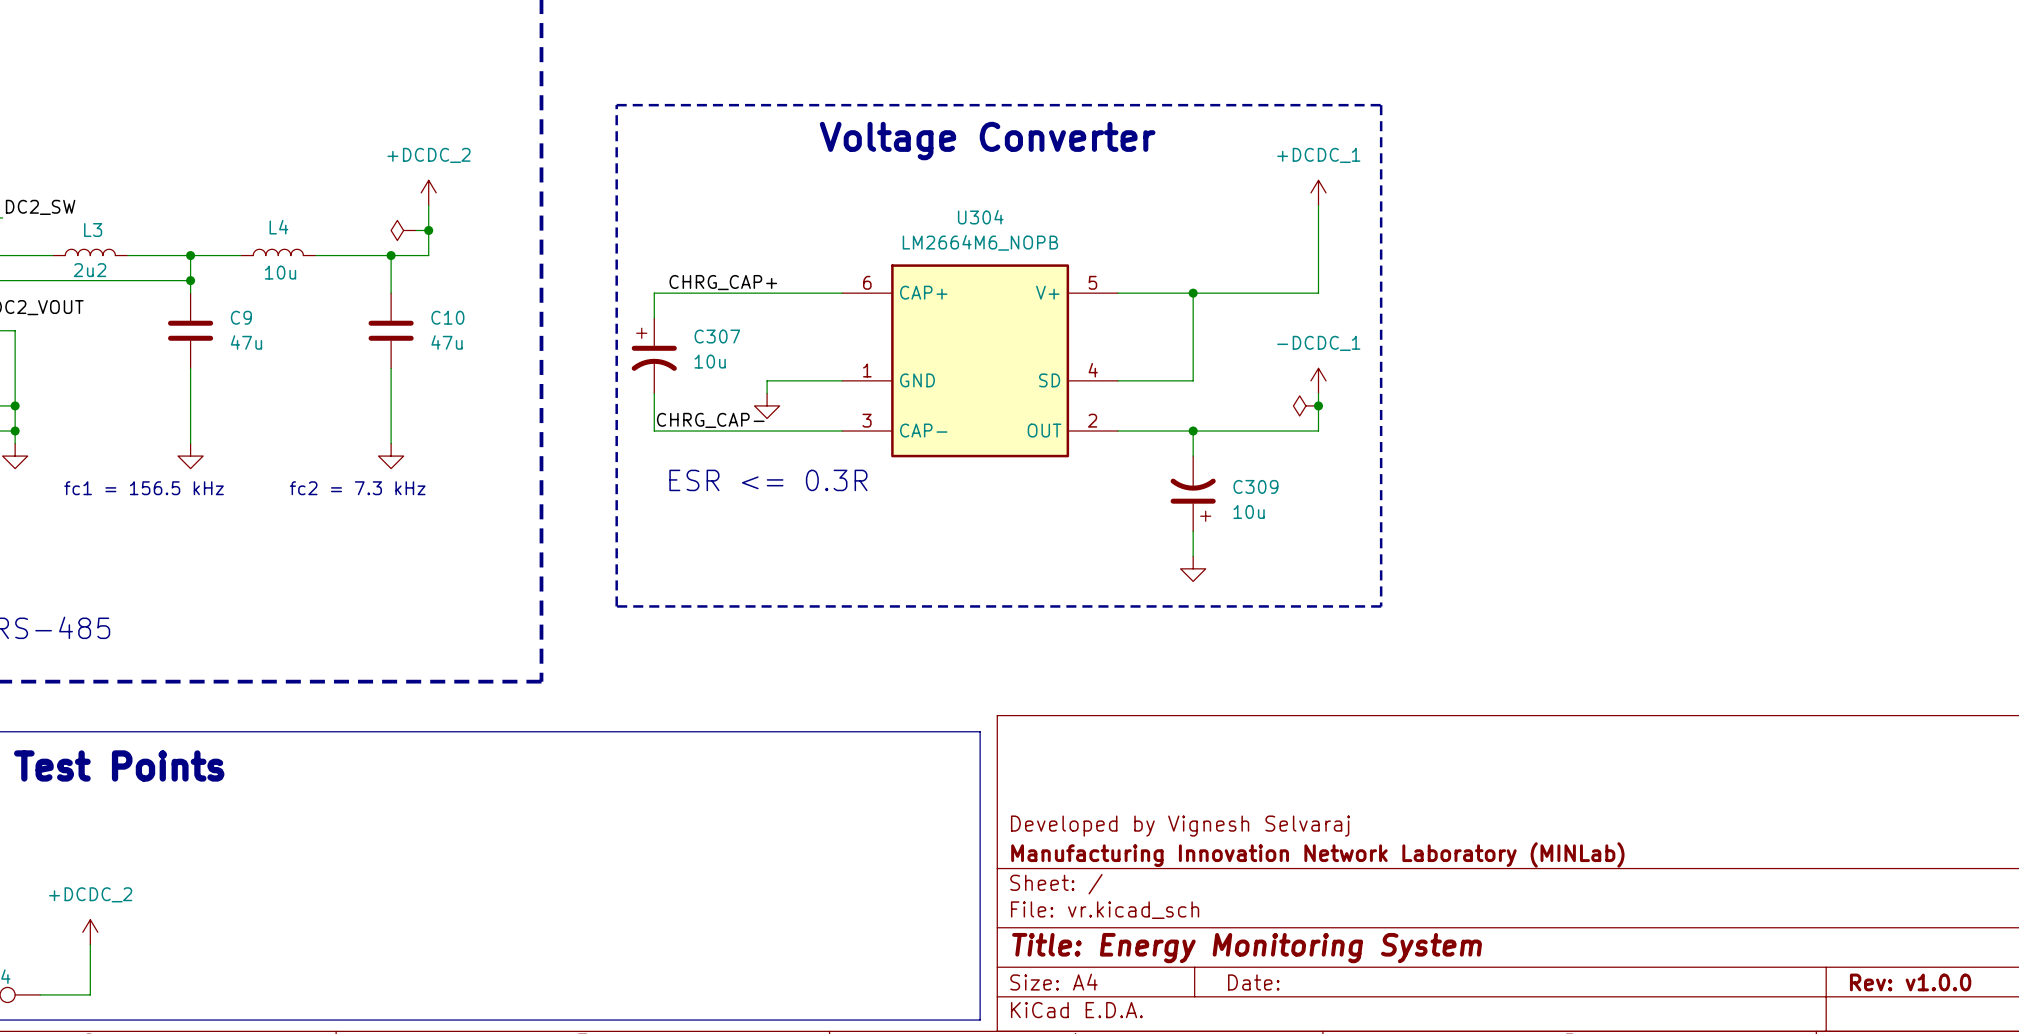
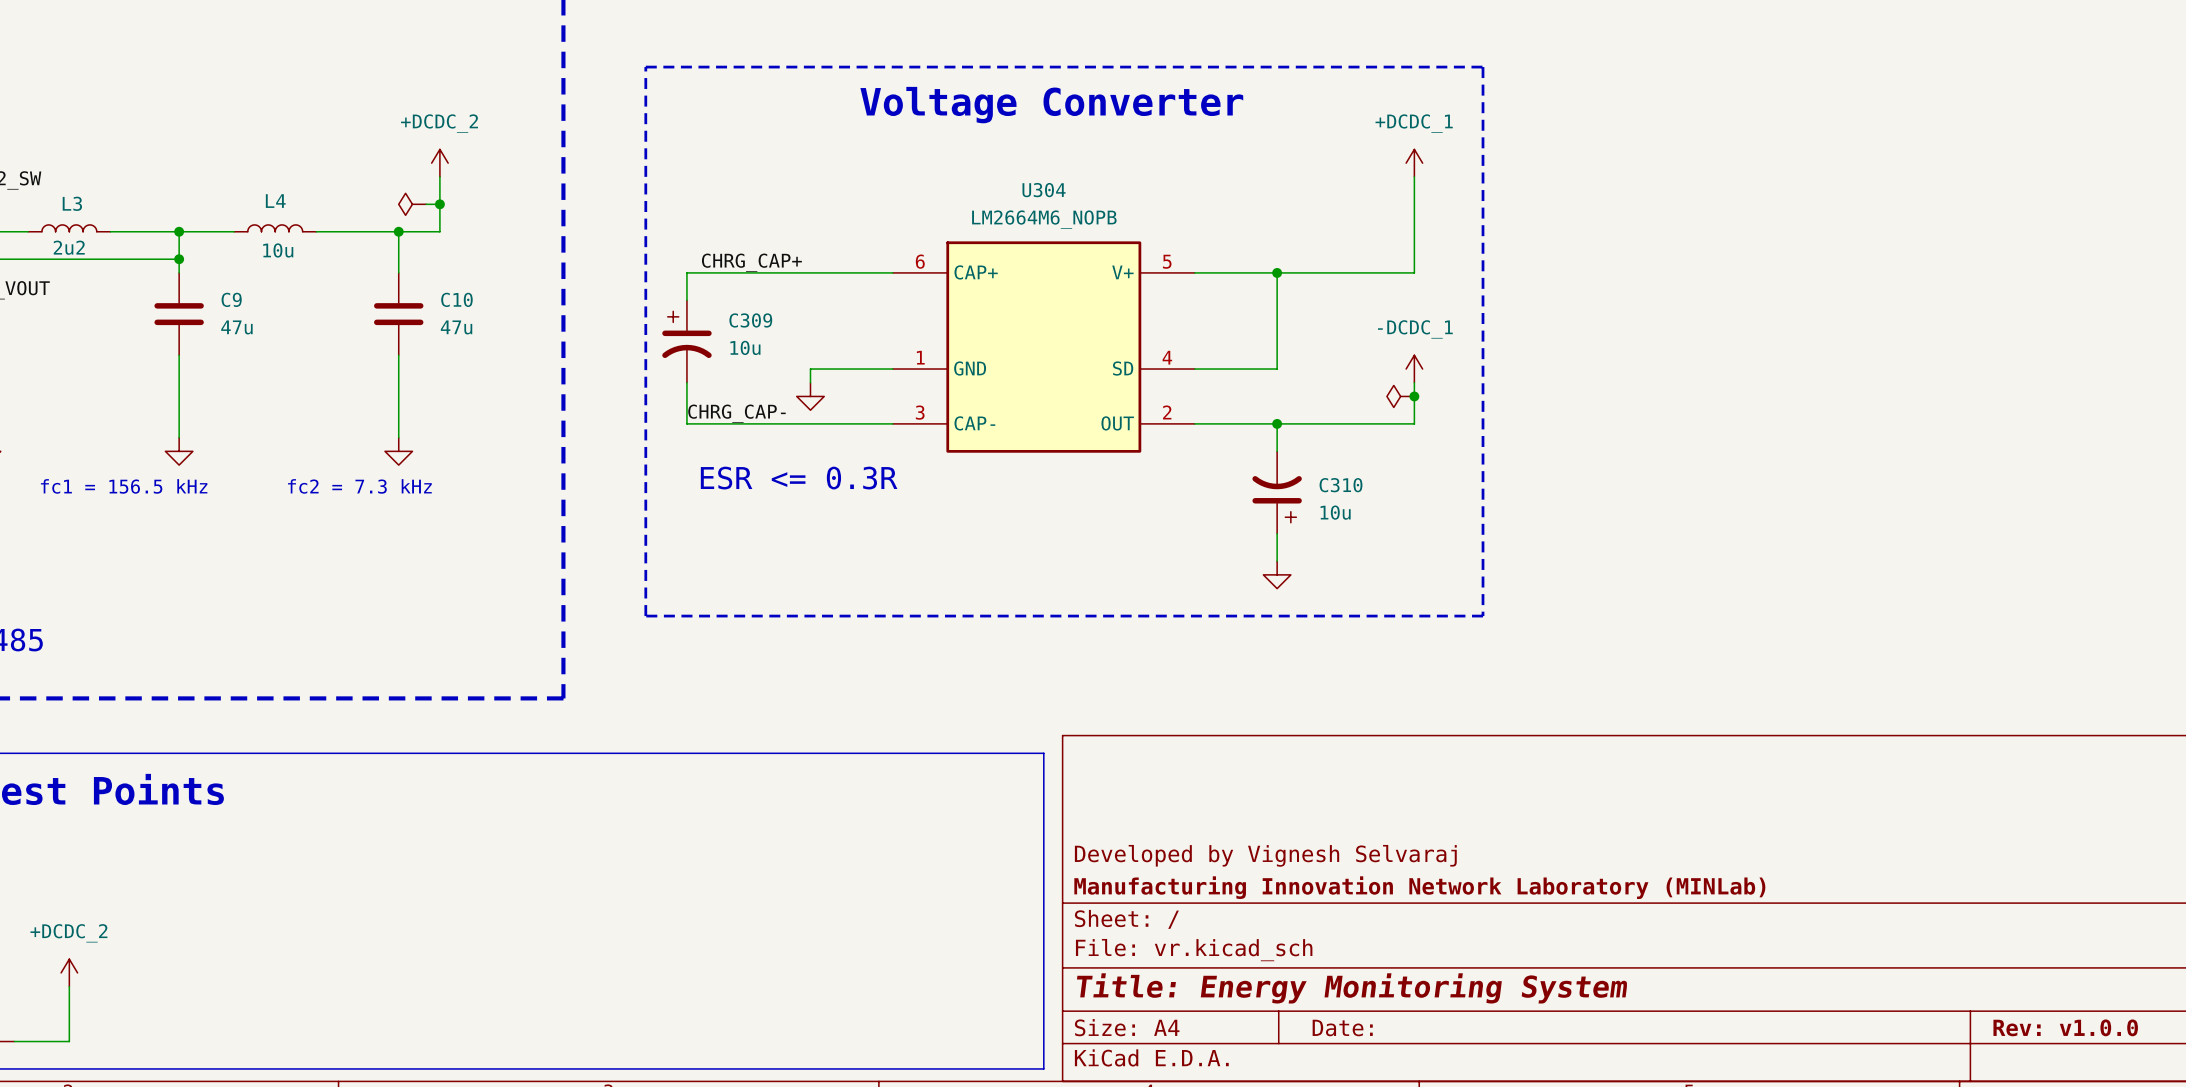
C307 name: C307 (717, 336) -> C309 (750, 320)
C309 name: C309 (1255, 486) -> C310 (1341, 485)

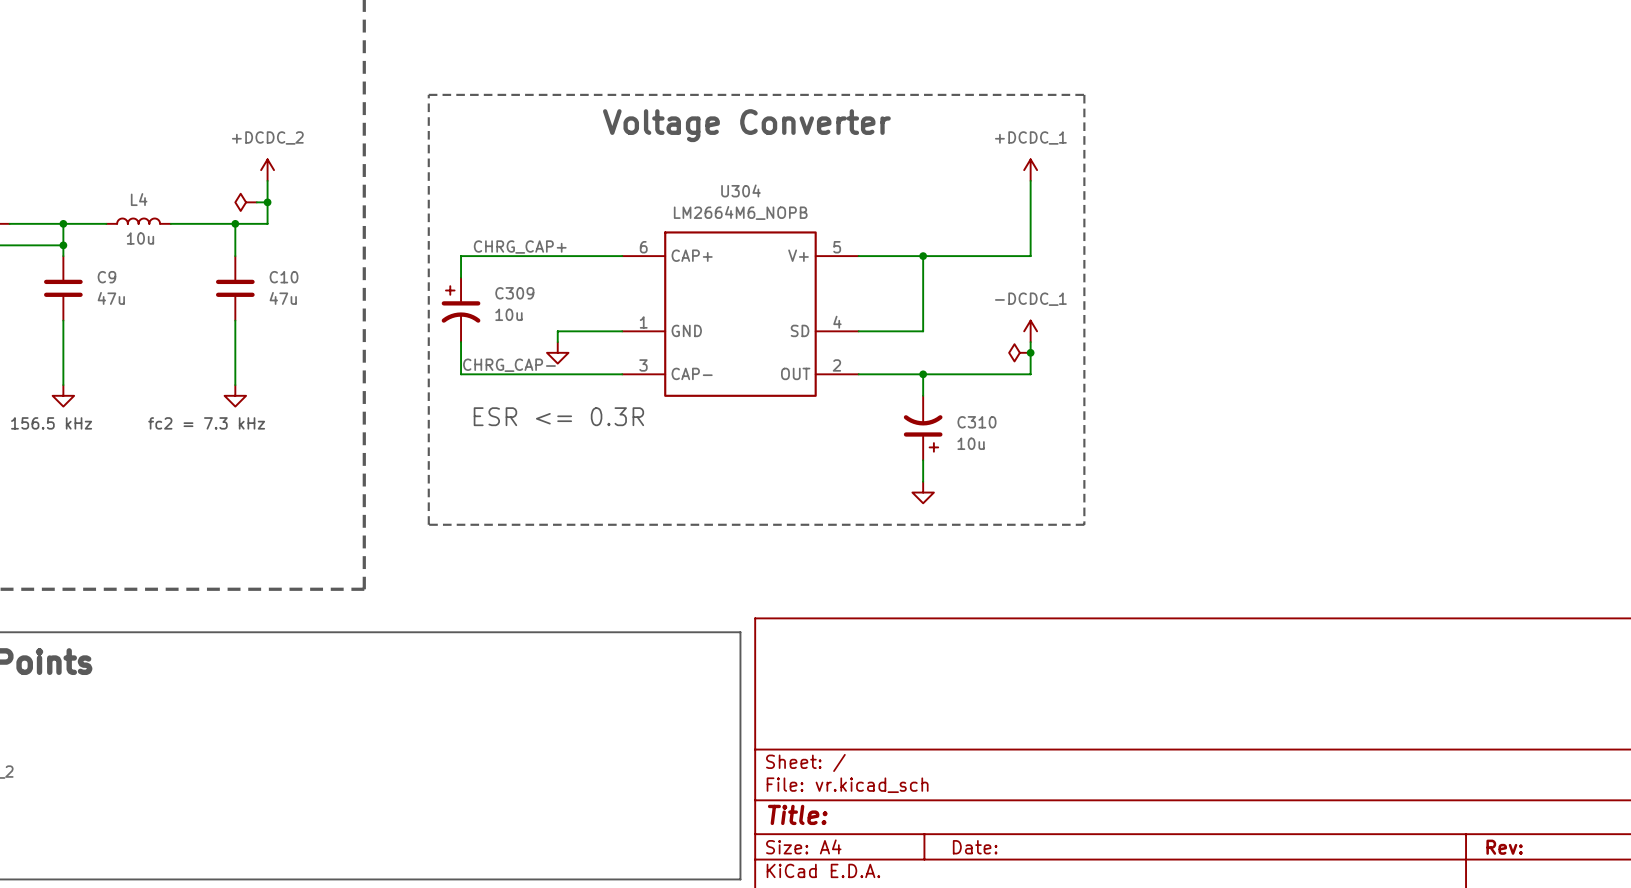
title block: Developed by Vignesh Selvaraj (1265, 855) -> none
title block: Manufacturing Innovation Network Laboratory (MINLab) (1419, 887) -> none
title block: Title: Energy Monitoring System (1352, 988) -> Title: (797, 814)
title block: Rev: v1.0.0 (2065, 1027) -> Rev: (1504, 847)

